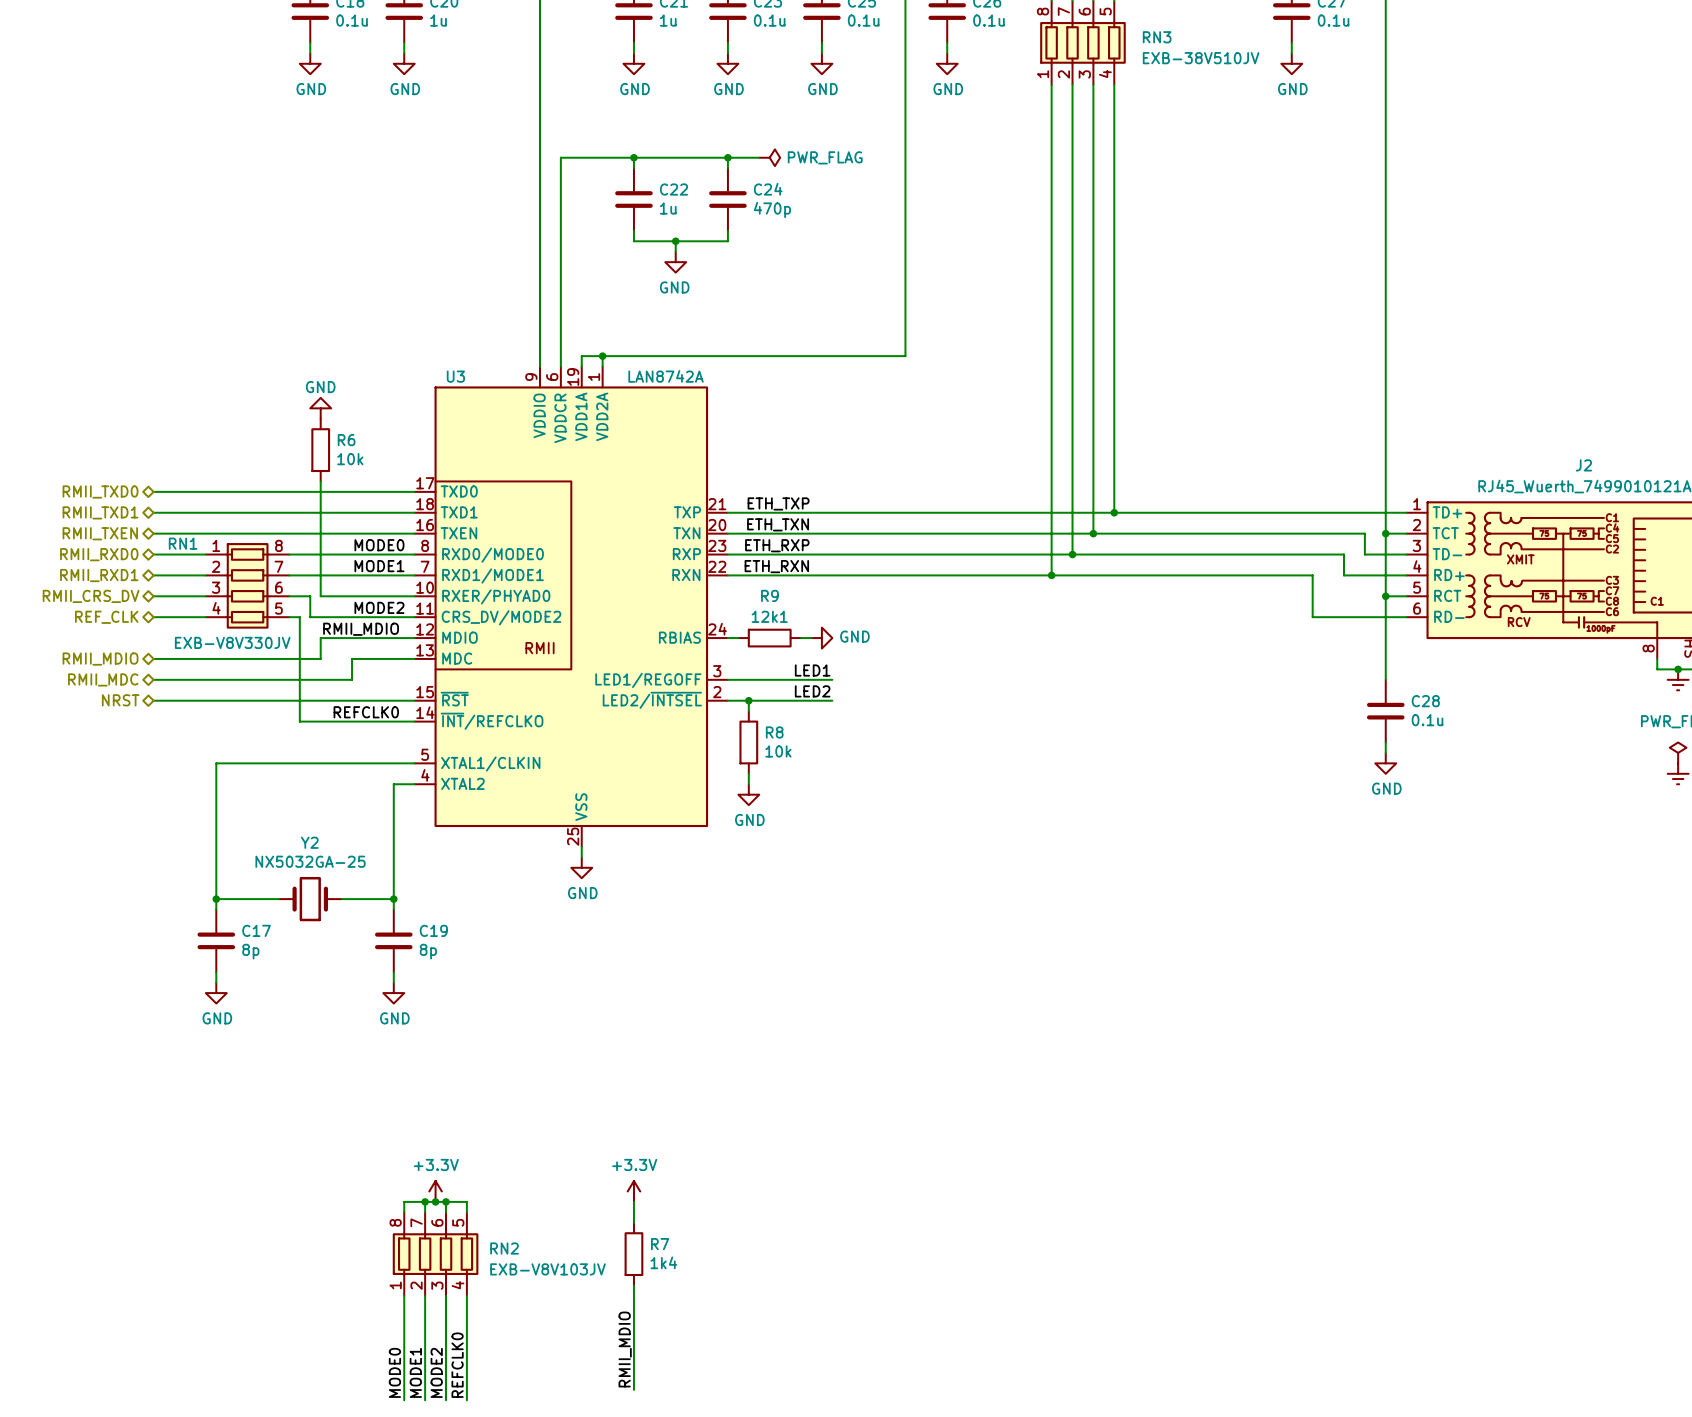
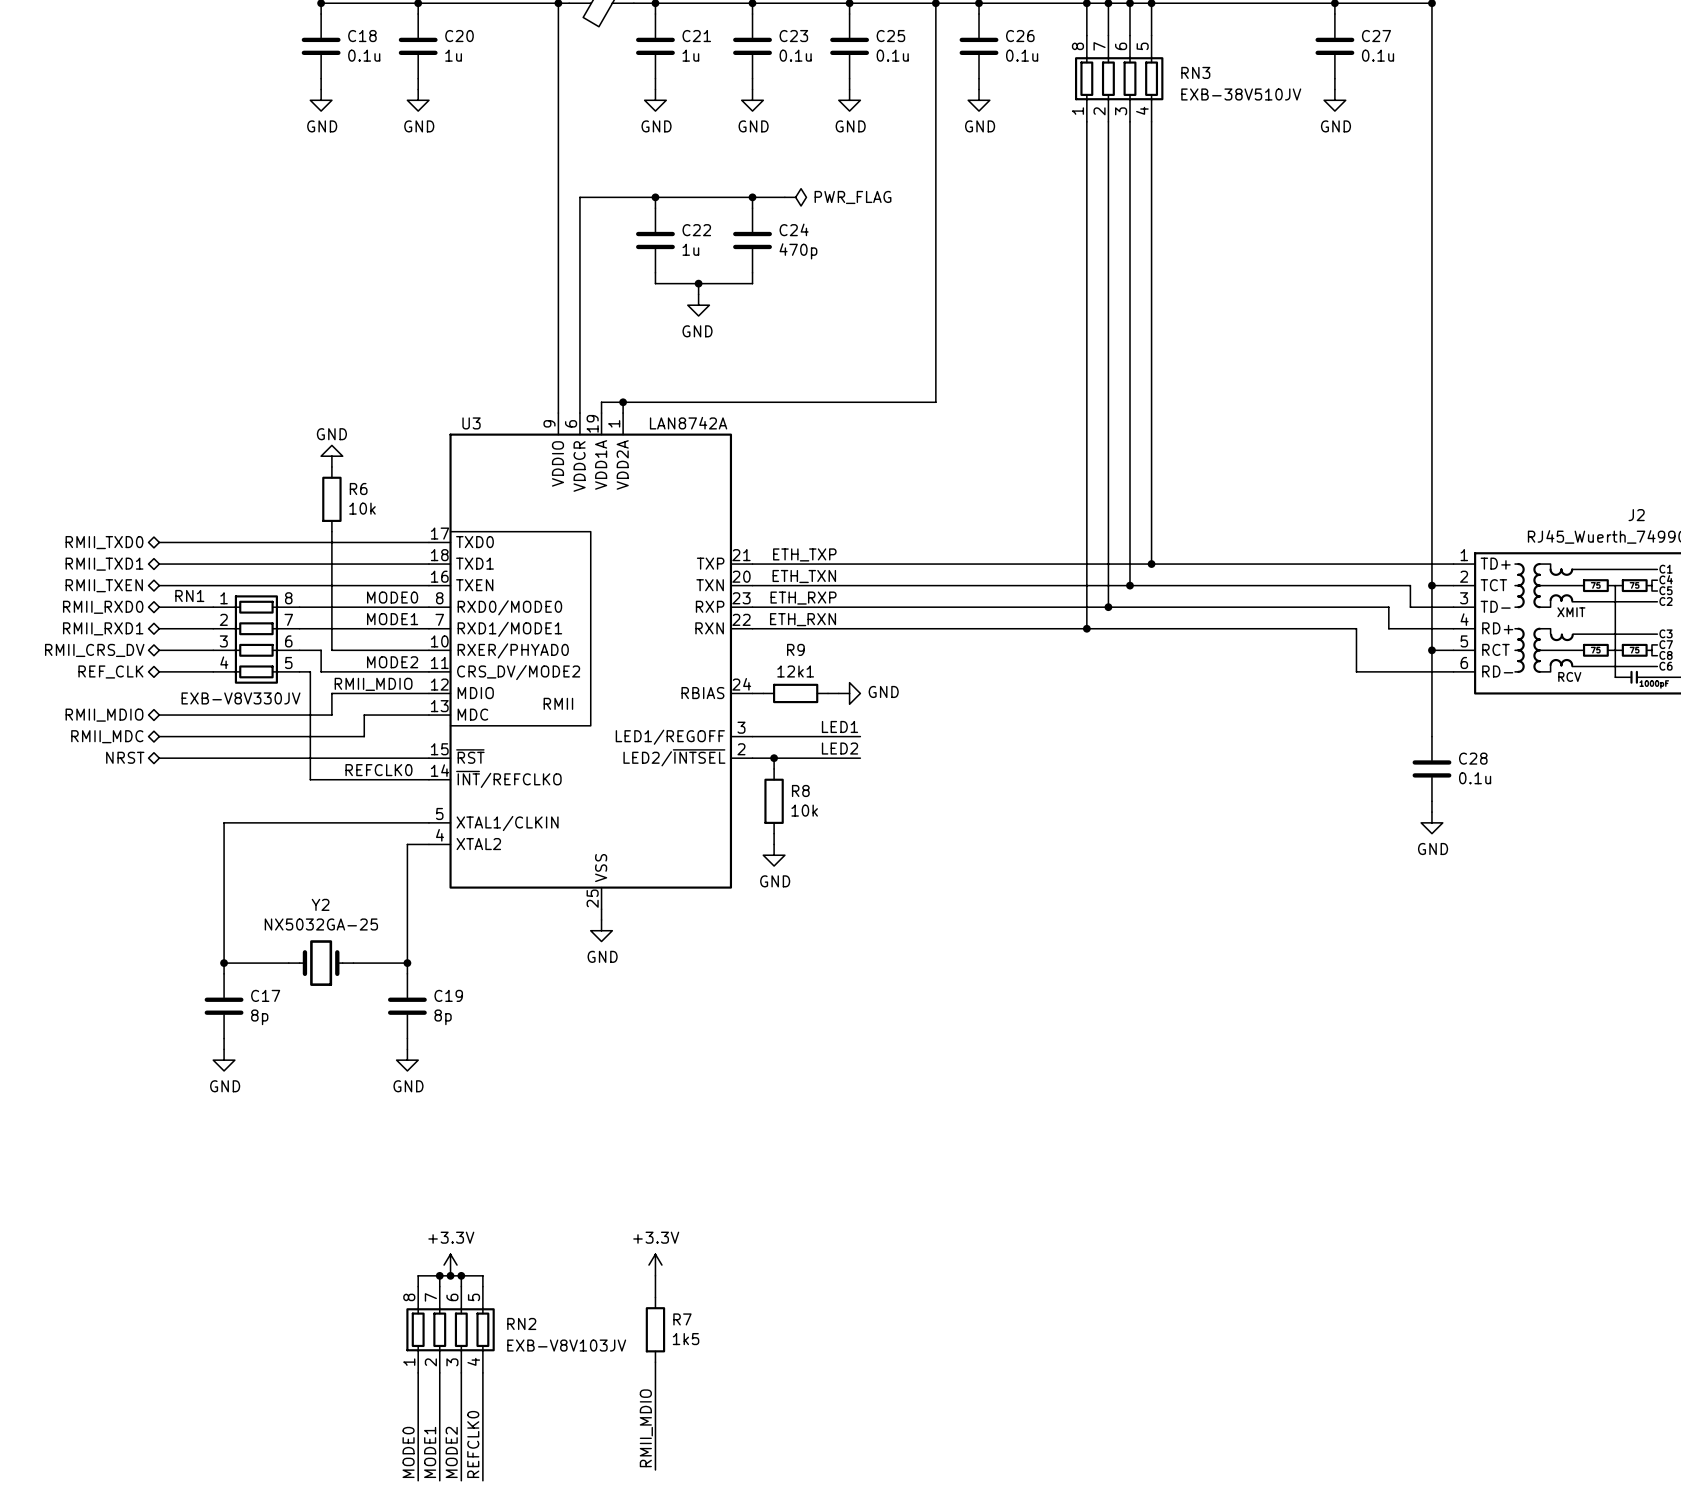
R7 value: 1k4 (663, 1262) -> 1k5 (686, 1339)

